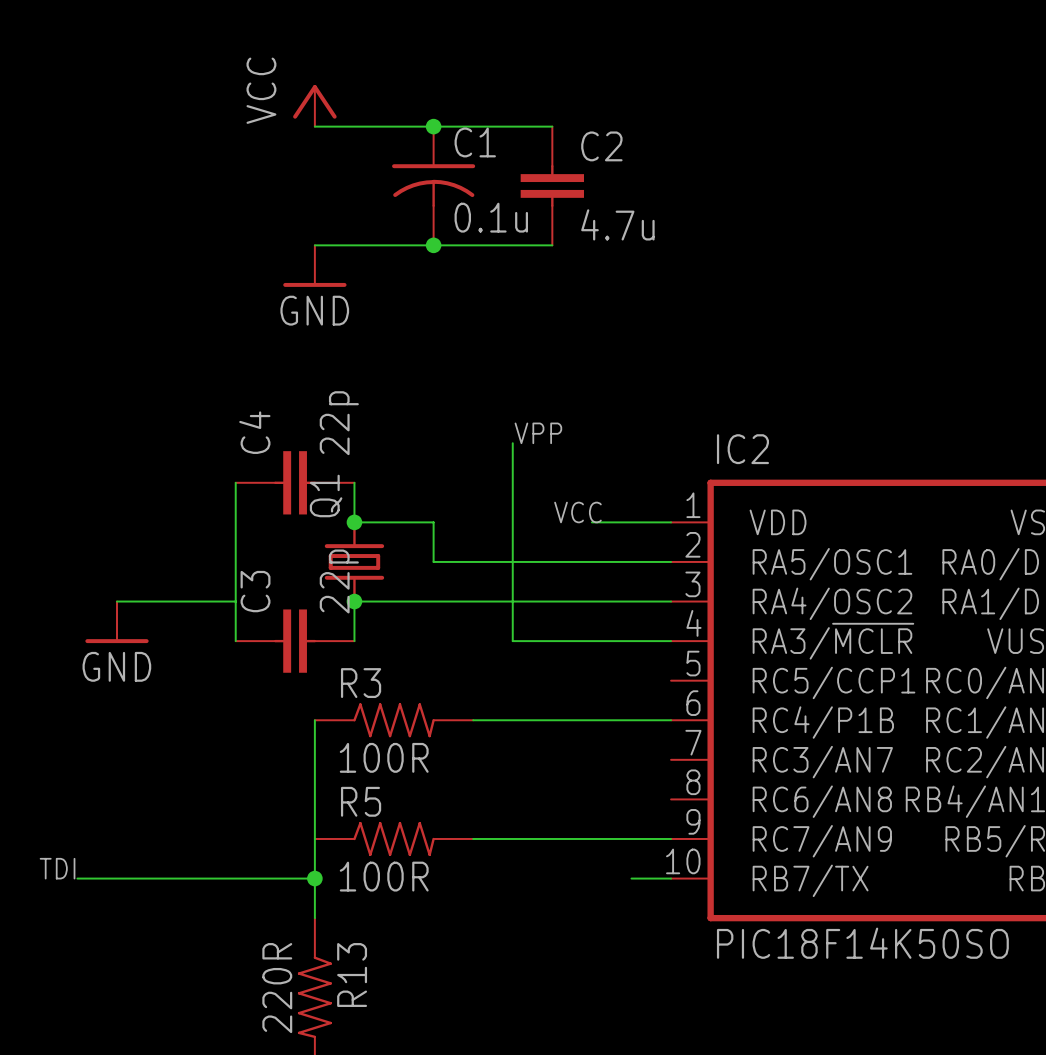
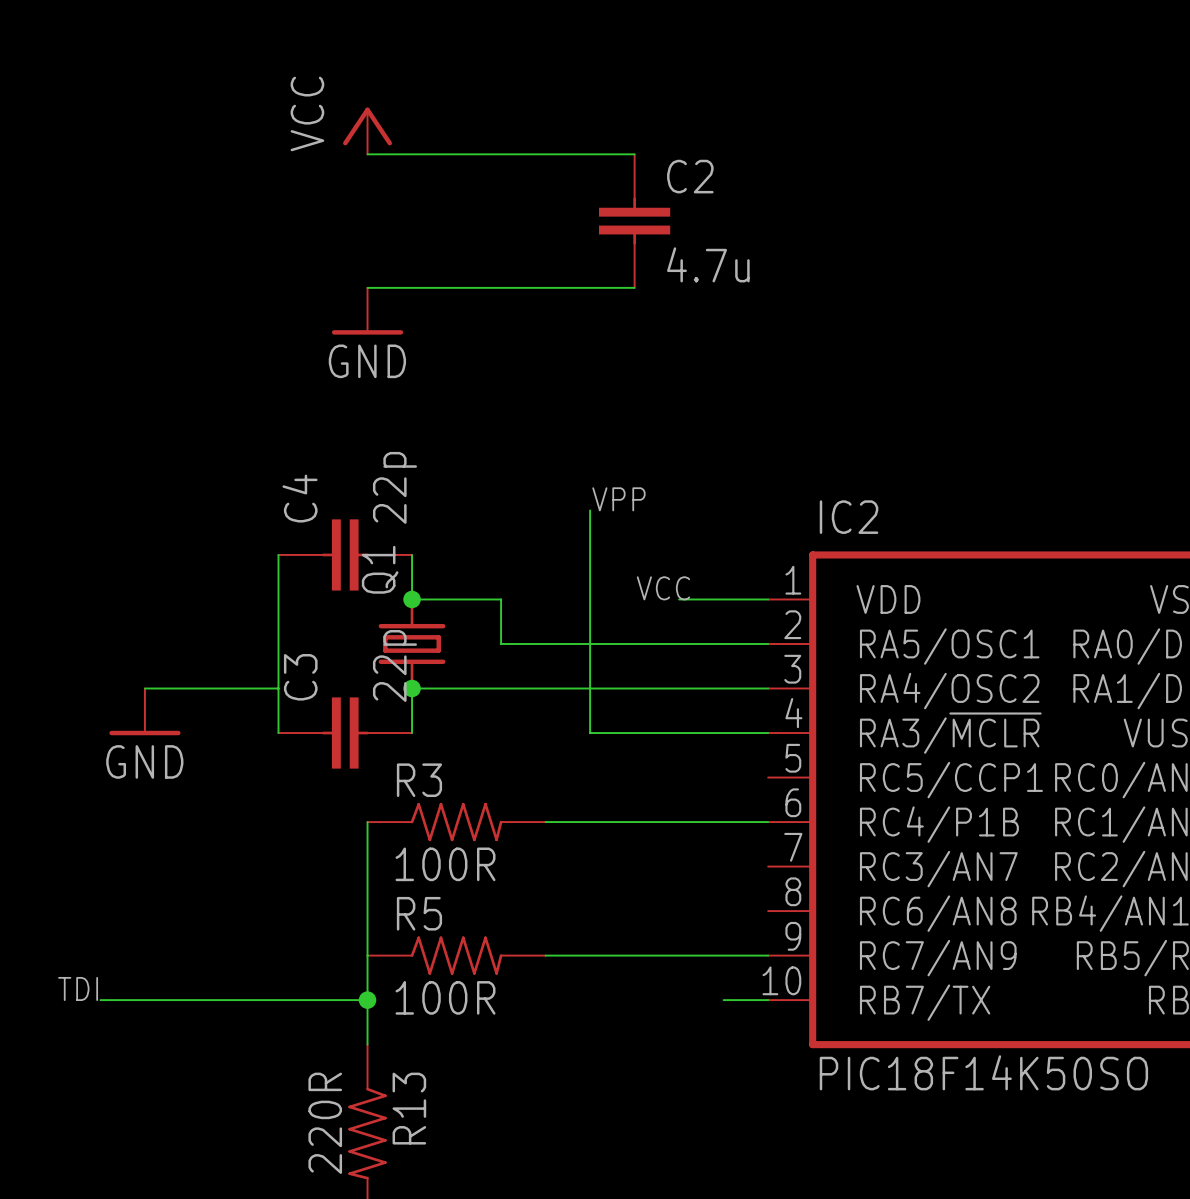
junction: (433, 126) -> none
C1: 0.1u (433, 185) -> none
junction: (433, 245) -> none

